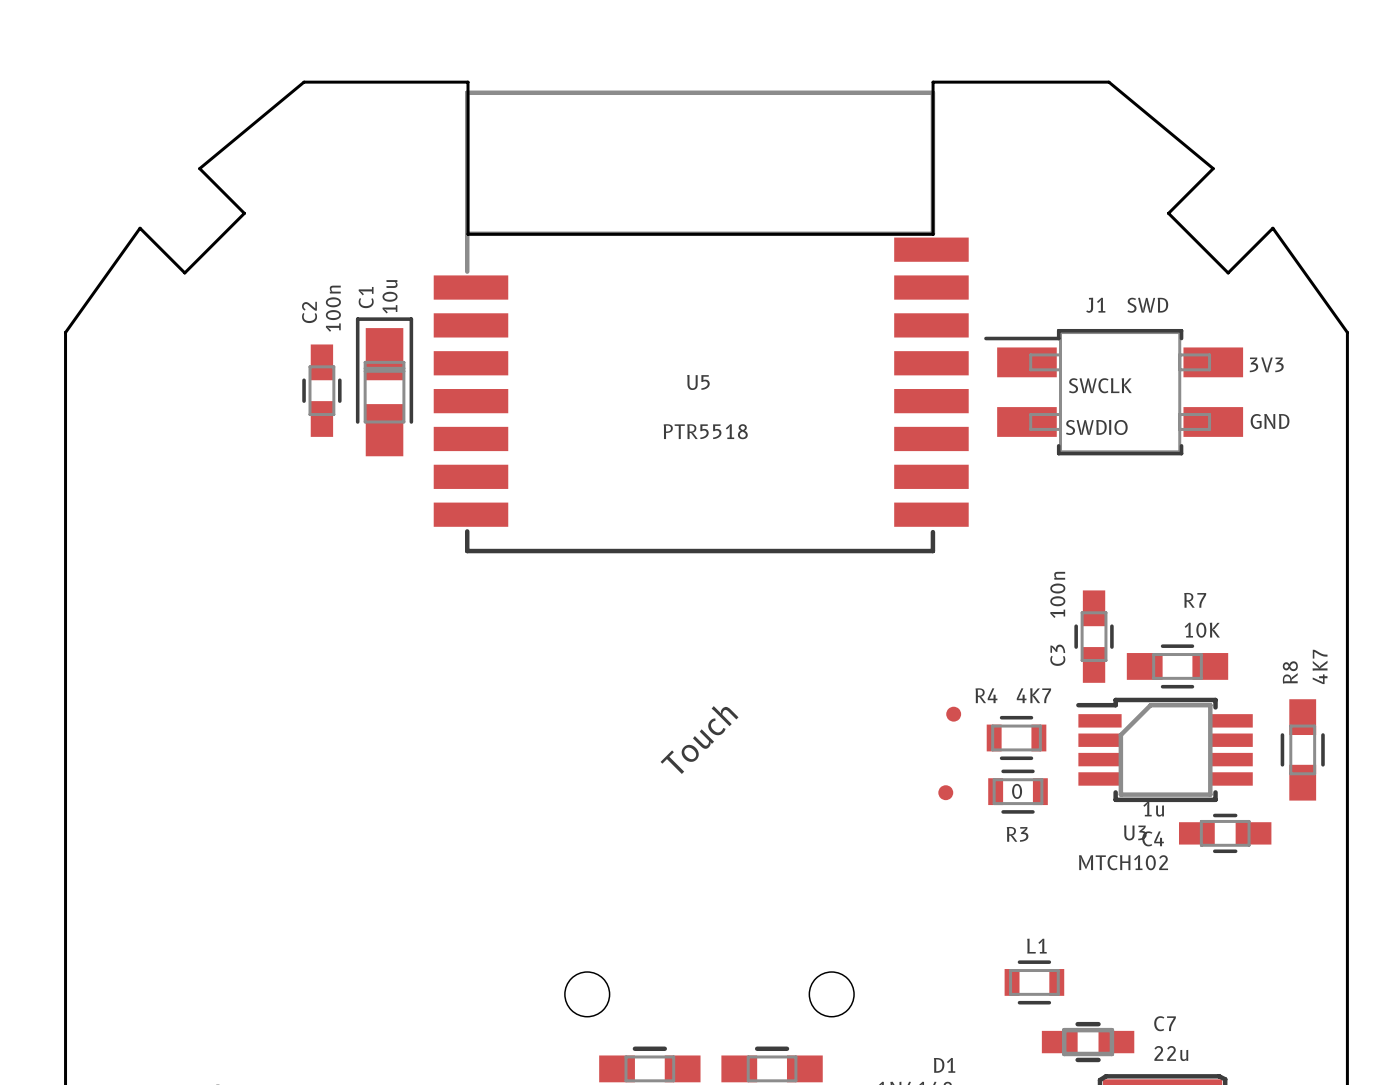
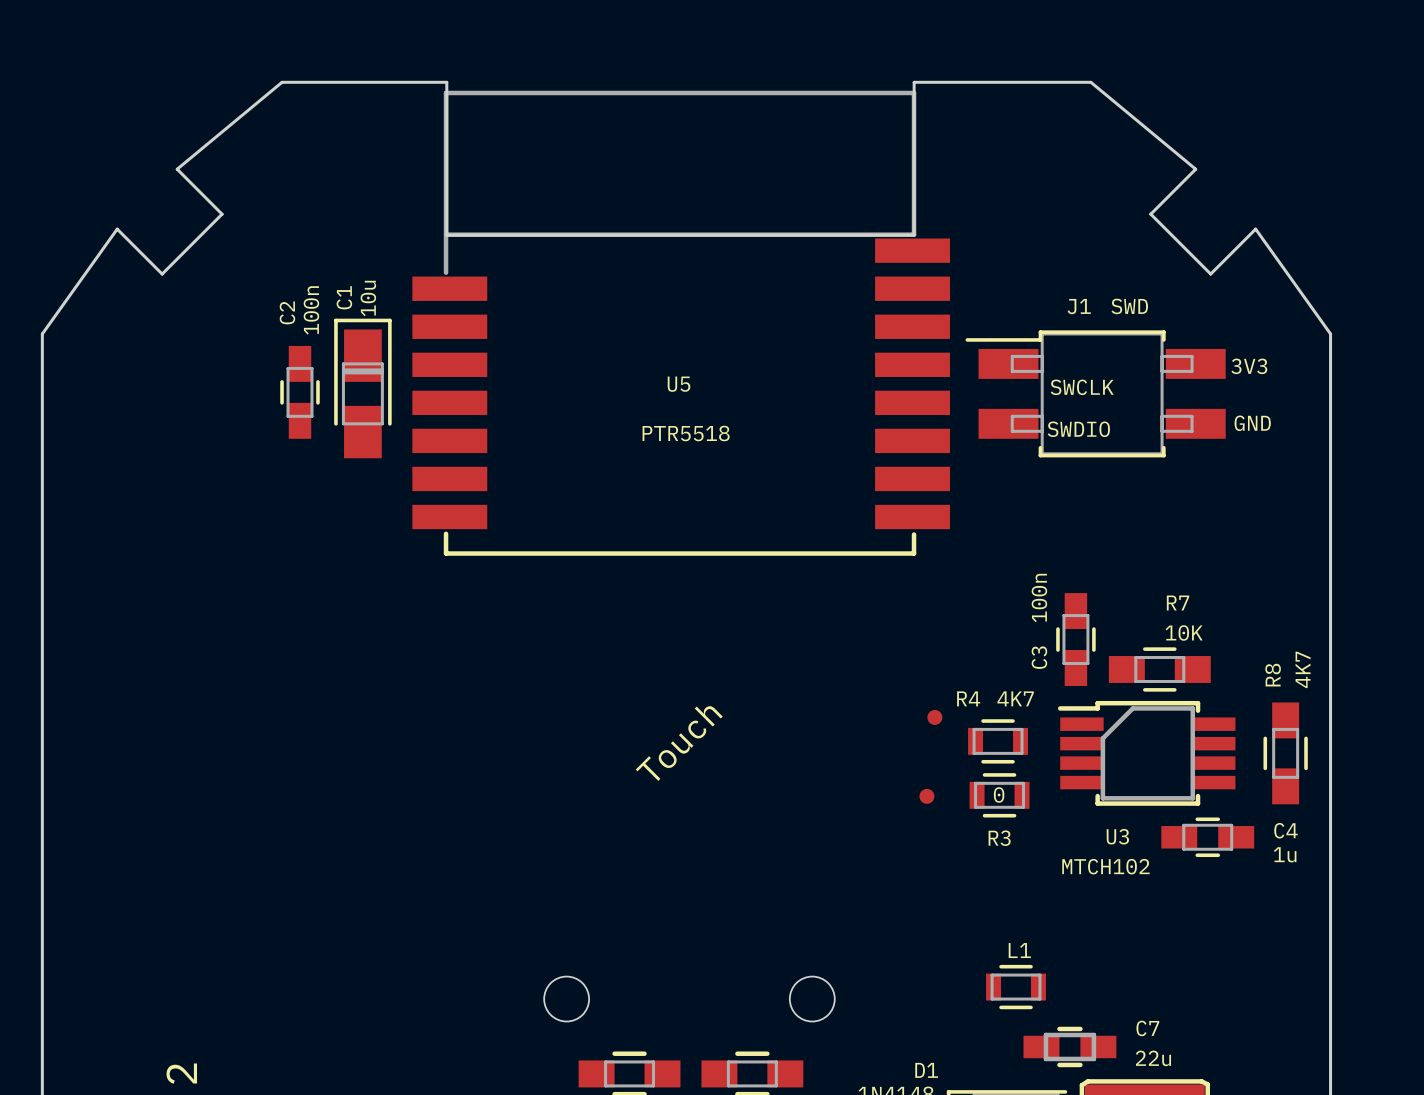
C4 value position: 1u (1153, 809) -> 1u (1285, 854)
C4 name position: C4 (1153, 838) -> C4 (1285, 830)

